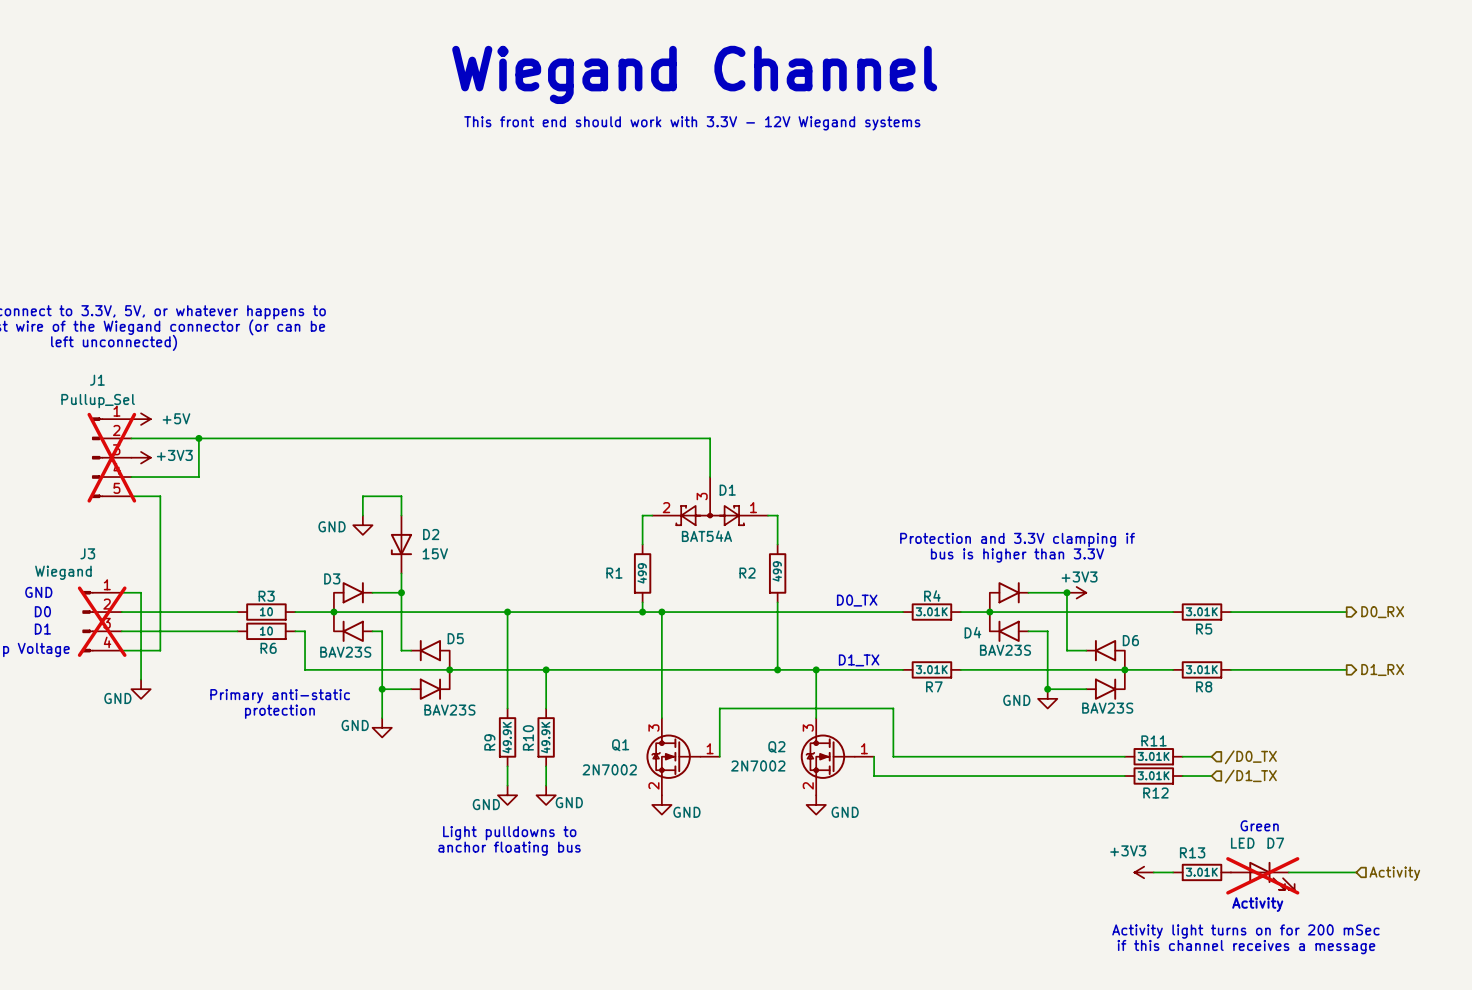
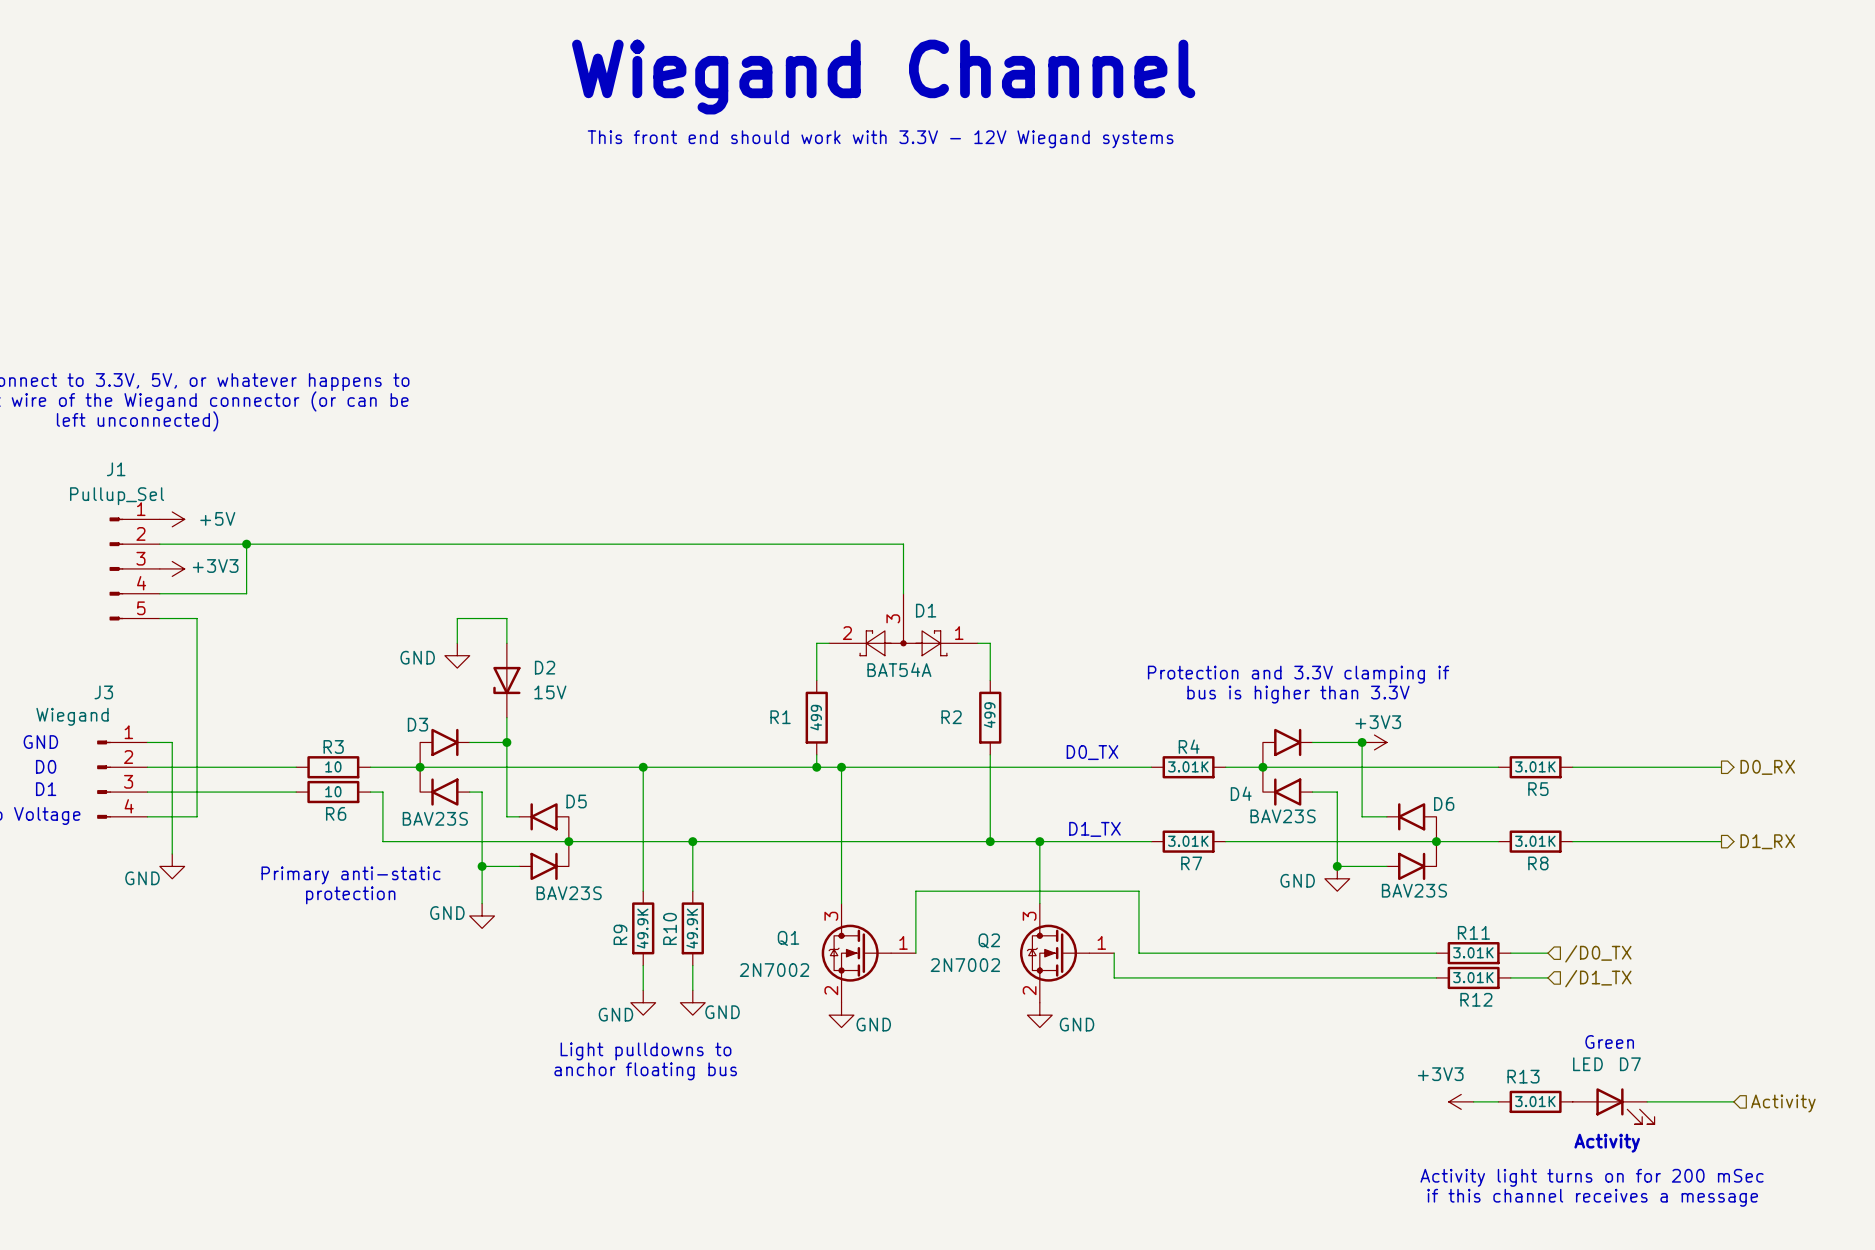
J1 do-not-place cross: (111, 457) -> none
J3 do-not-place cross: (102, 621) -> none
D7 do-not-place cross: (1262, 875) -> none

